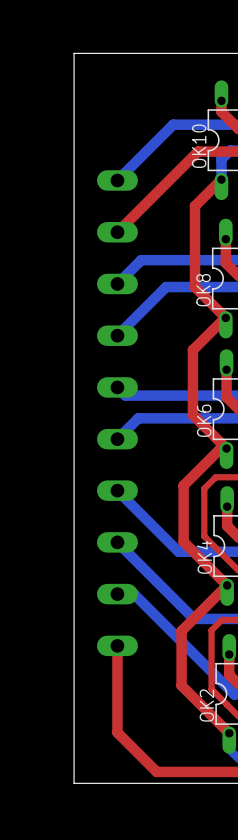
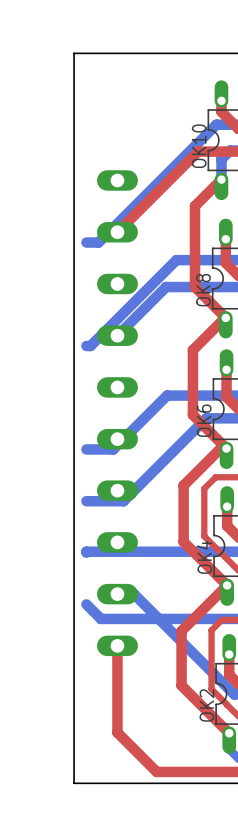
bottom track: (216, 124) (173, 124) (117, 180) -> (216, 124) (98, 242) (86, 242)
bottom track: (176, 260) (141, 260) (117, 283) -> (176, 260) (90, 346) (86, 346)
bottom track: (117, 387) (125, 395) (167, 395) -> (86, 449) (113, 449) (167, 395)
bottom track: (206, 418) (138, 418) (117, 439) -> (206, 418) (123, 501) (86, 501)
bottom track: (117, 490) (178, 551) -> (86, 552) (178, 551)
bottom track: (117, 542) (194, 618) -> (86, 604) (100, 618) (194, 618)

